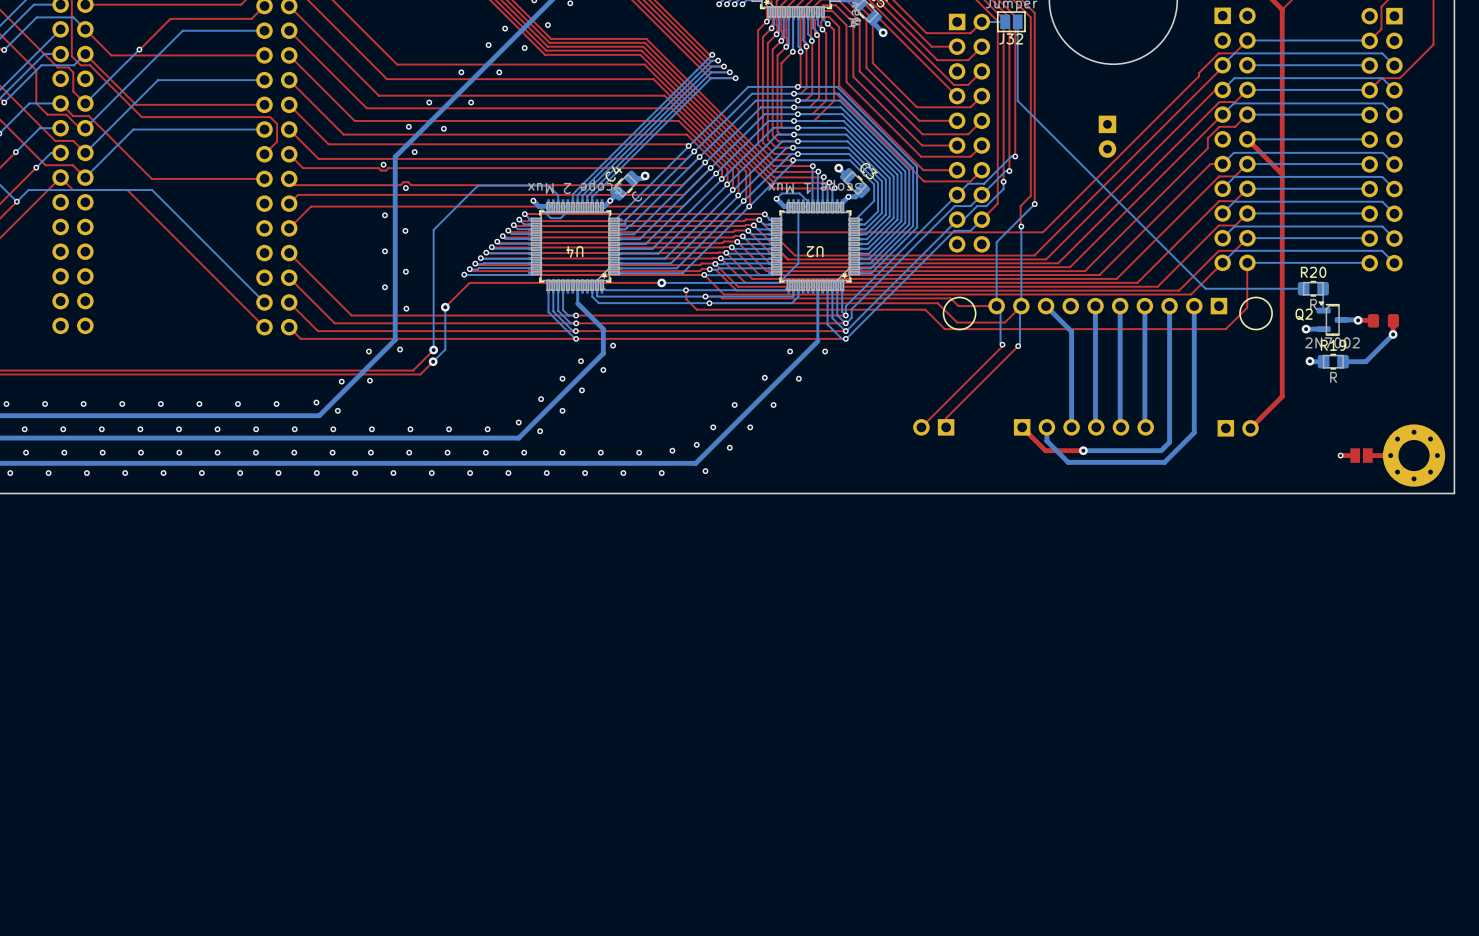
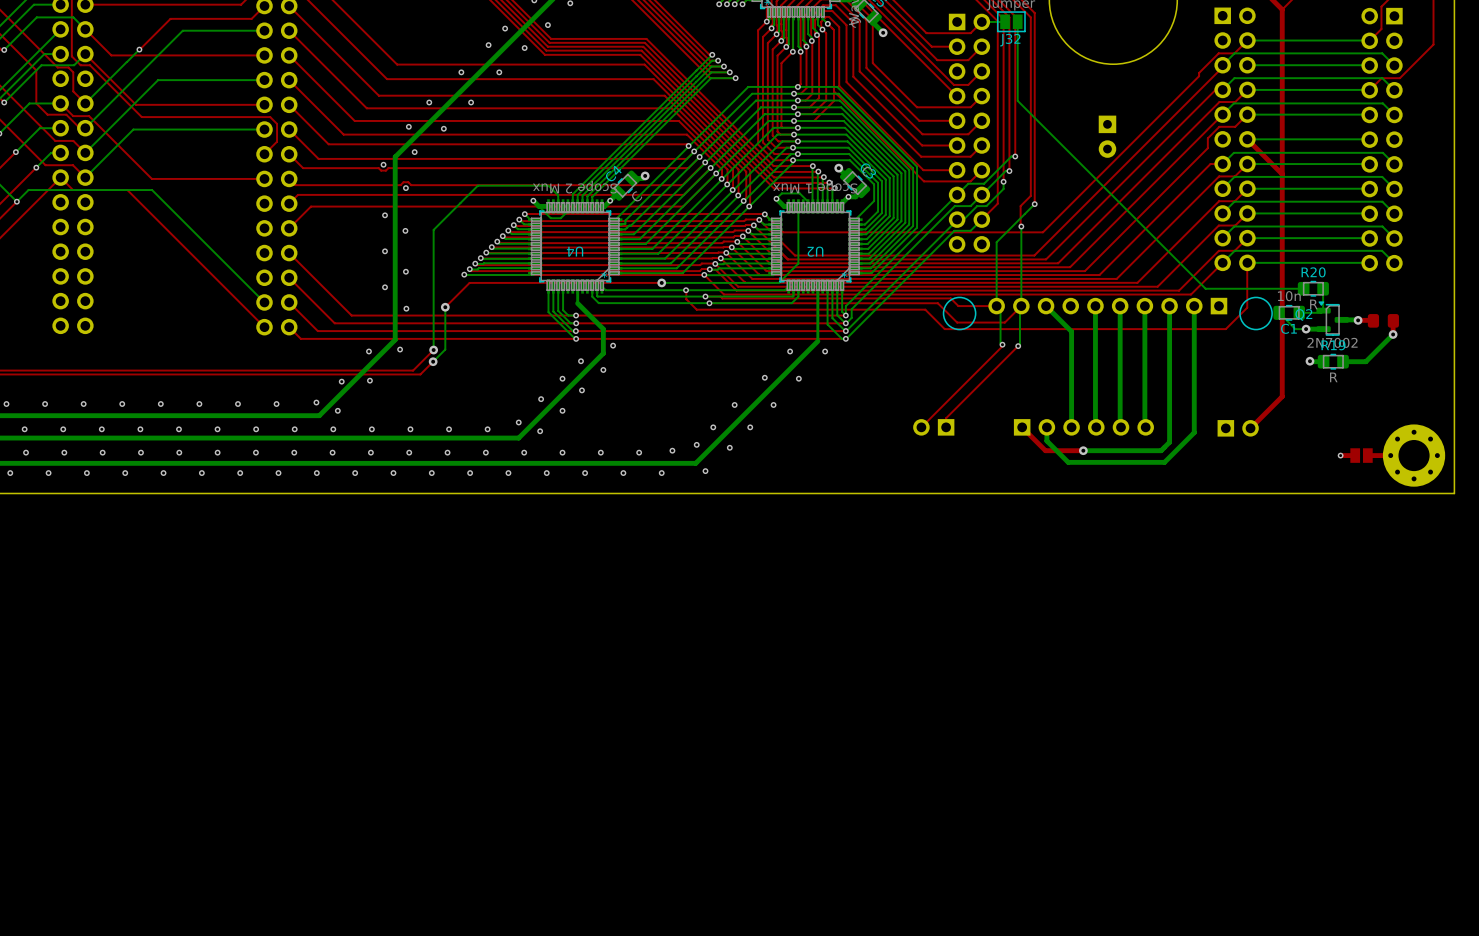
bottom track: none -> (1323, 310) (1321, 312) (1299, 312)
bottom track: none -> (1279, 312) (1295, 329) (1306, 329)
C1: none -> 10n (1289, 312)

